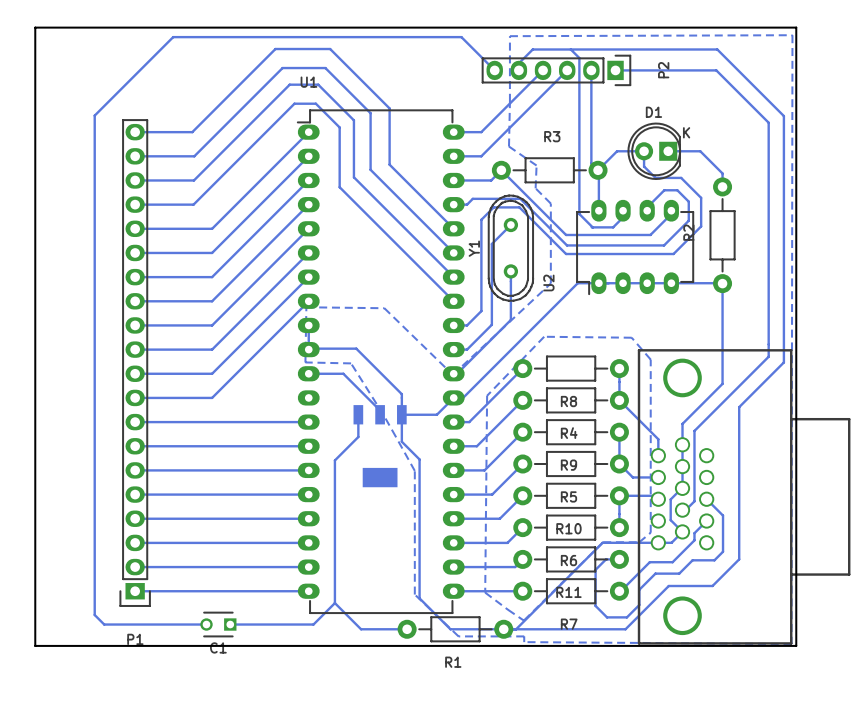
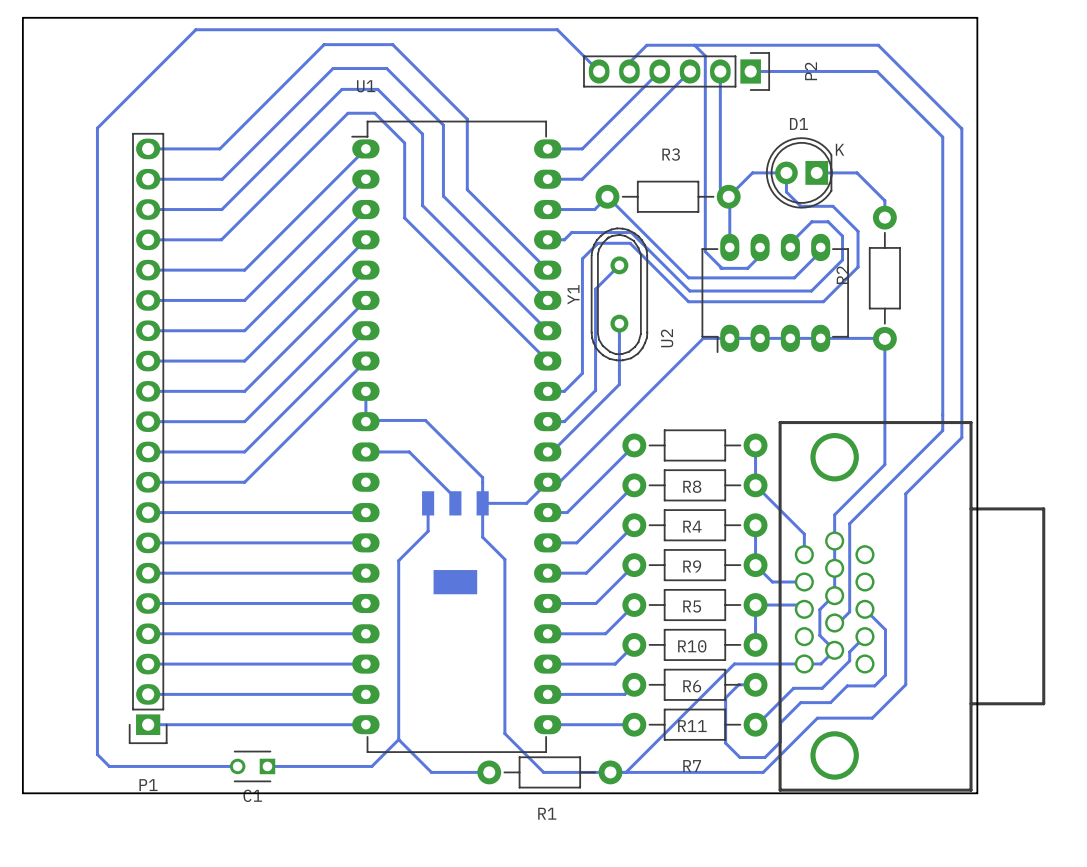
bottom zone outline: (792, 35) (509, 36) (508, 146) (536, 165) (535, 188) (550, 203) (550, 283) (452, 374) (384, 308) (306, 307) (305, 362) (351, 363) (383, 414) (414, 470) (414, 594) (458, 636) (524, 636) (524, 642) (791, 644) (792, 35) -> none
bottom zone outline: (544, 336) (631, 337) (650, 359) (650, 532) (639, 542) (603, 542) (524, 620) (485, 592) (487, 395) (544, 336) -> none

